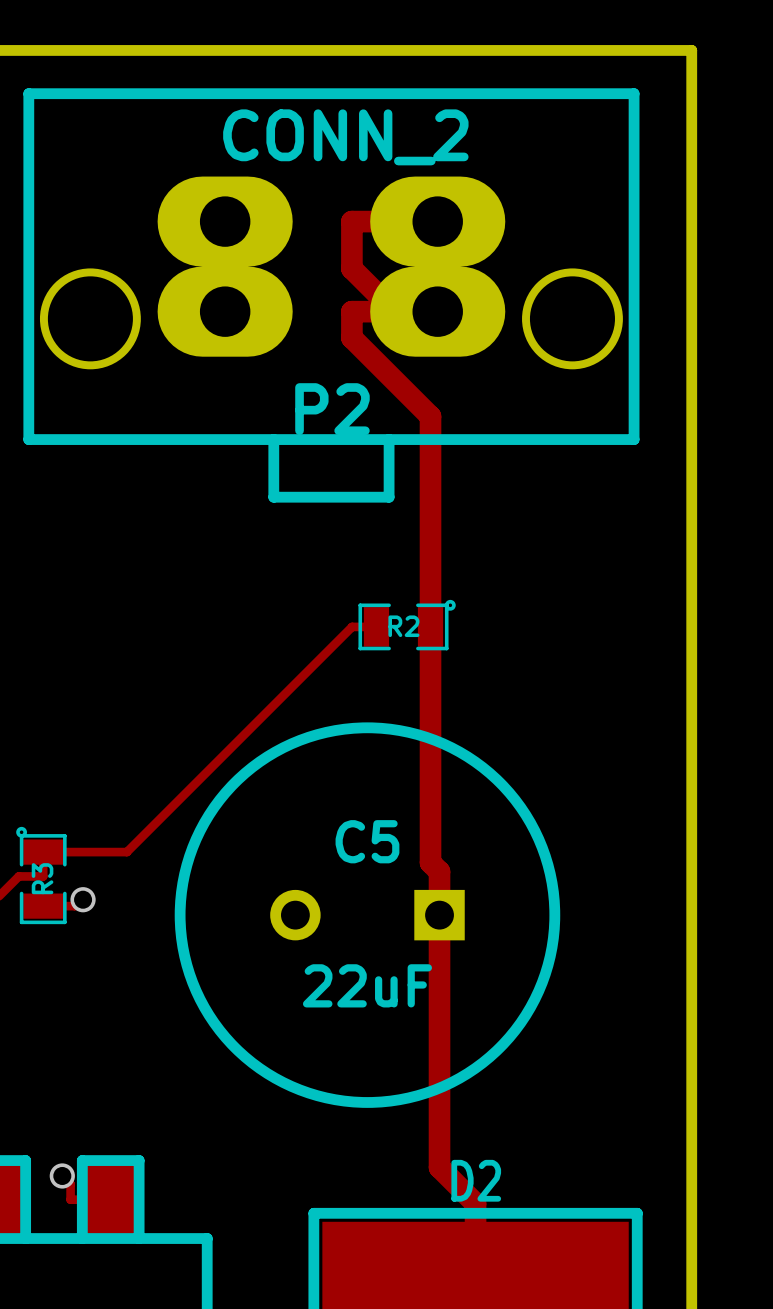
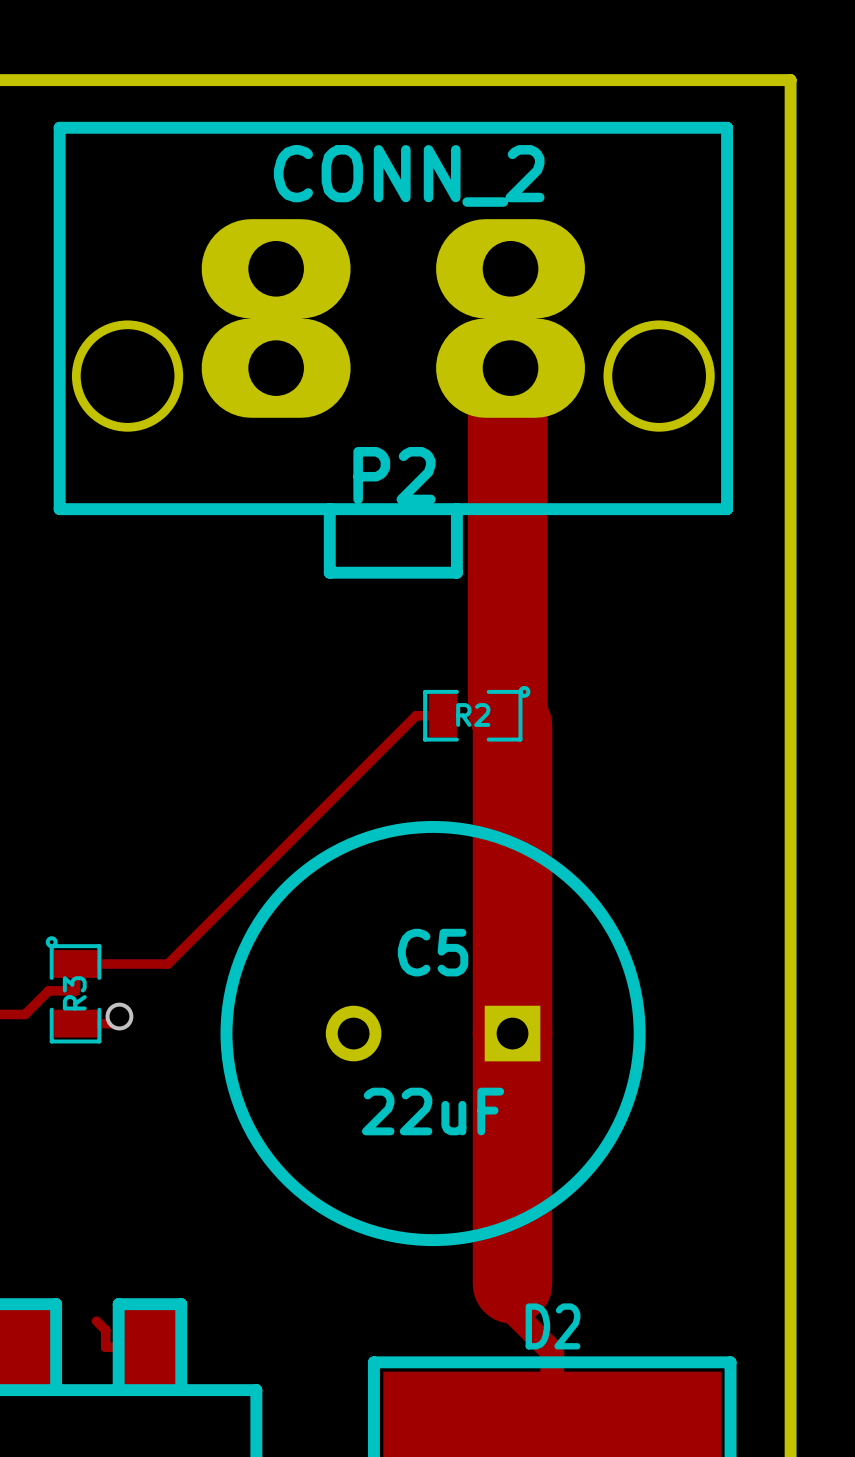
track: (437, 221) (351, 221) (351, 268) (394, 311) -> none
track: (437, 311) (351, 311) (351, 337) (430, 416) (430, 862) (439, 871) -> (510, 368) (507, 370) (507, 710) (502, 715) (512, 725) (512, 985)
track width: thin (439, 871) (439, 1142) -> thick (512, 985) (512, 1284)
via: (62, 1175) -> none

